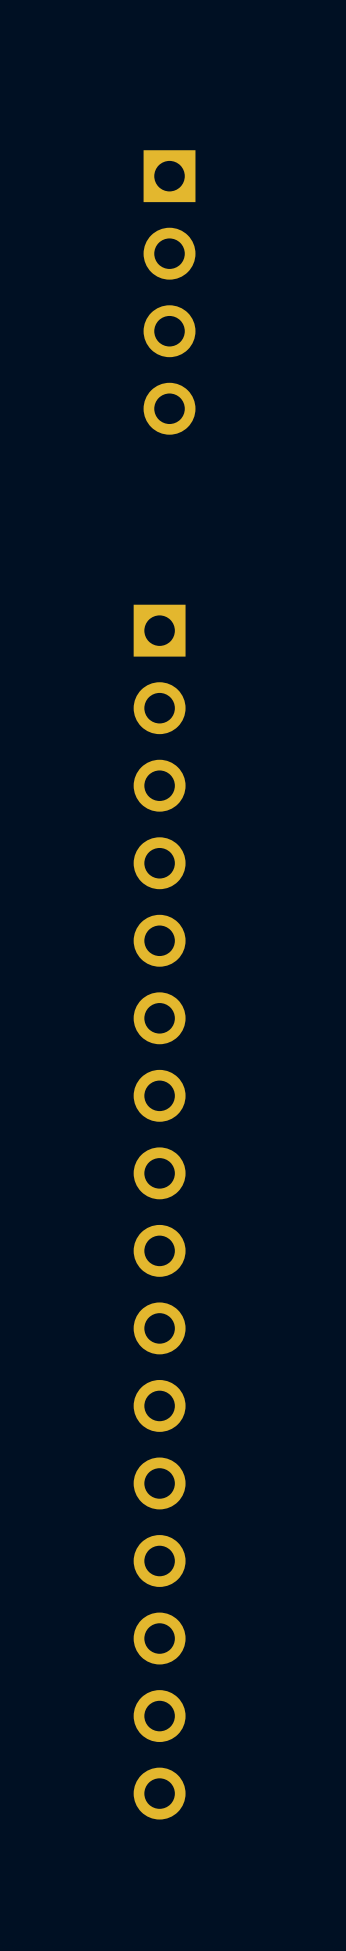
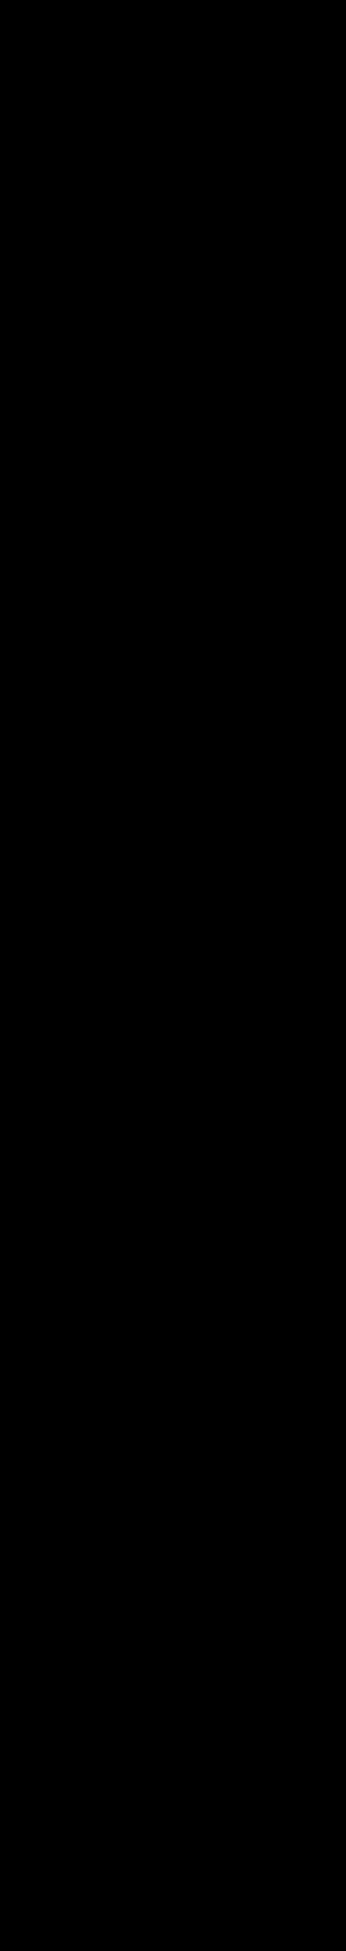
part: (169, 292) -> none
part: (159, 1212) -> none

